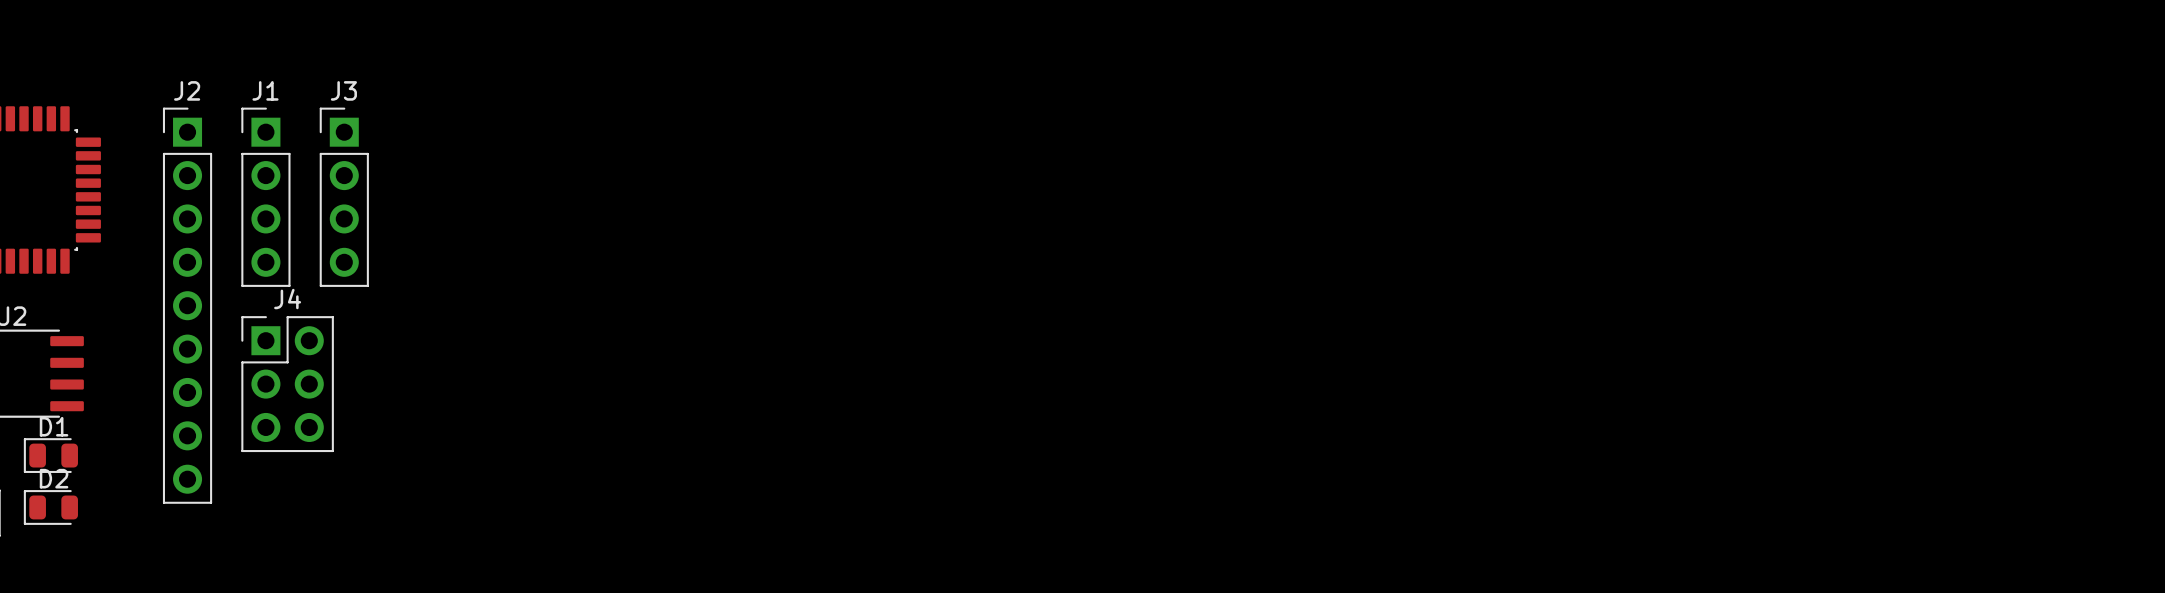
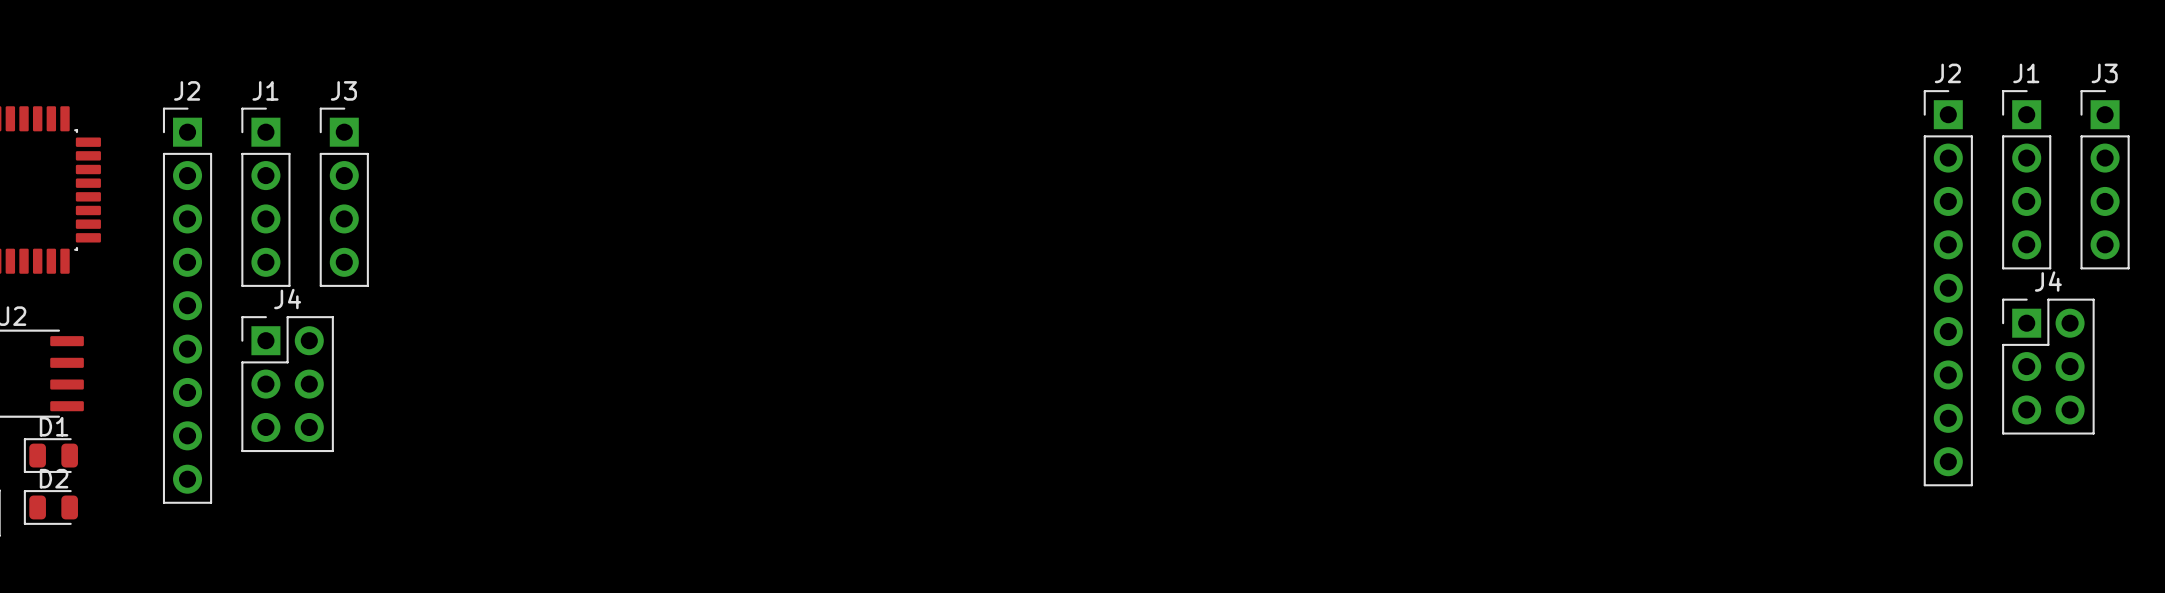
J1: none -> (2026, 179)
J3: none -> (2105, 179)
J2: none -> (1948, 288)
J4: none -> (2048, 366)

